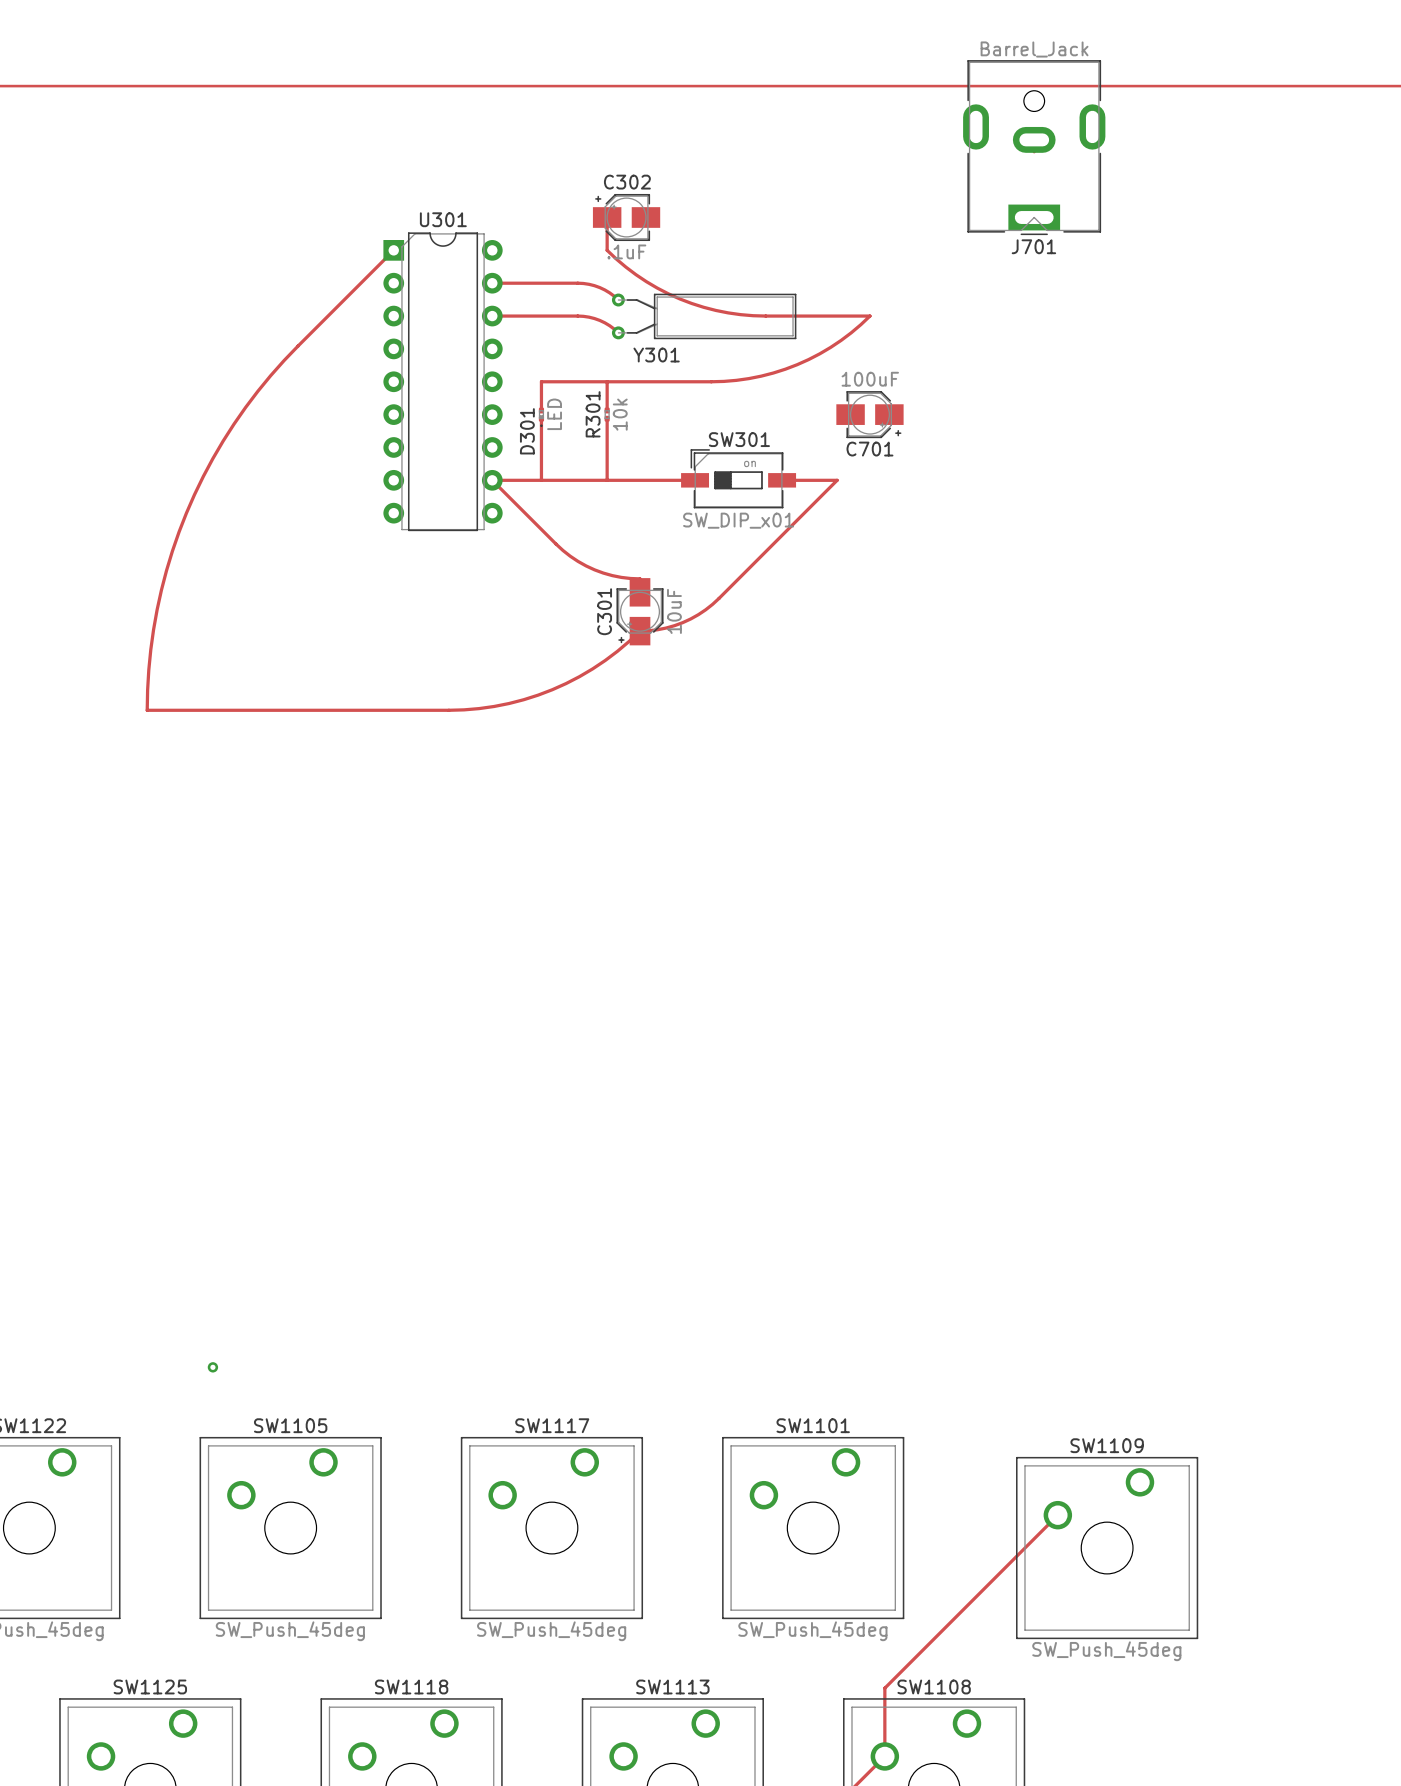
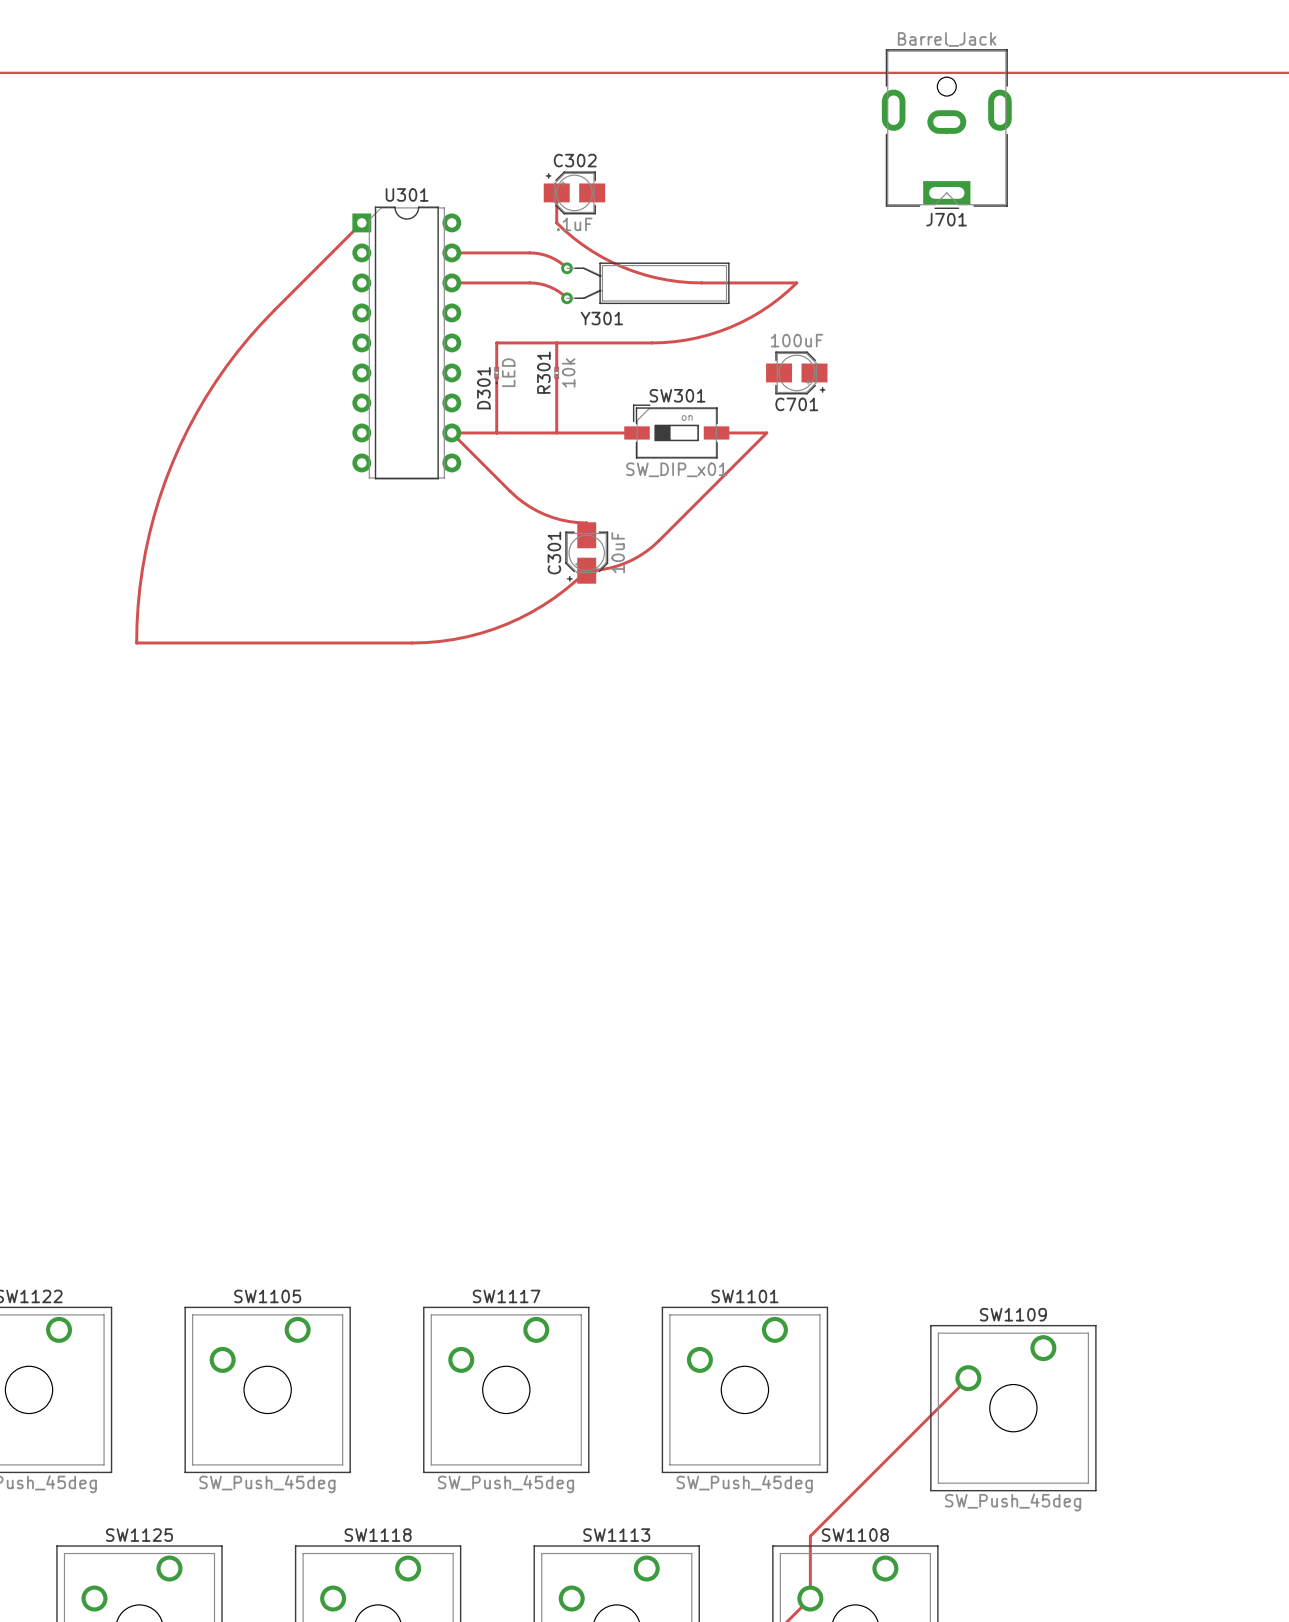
via: (212, 1367) -> none

